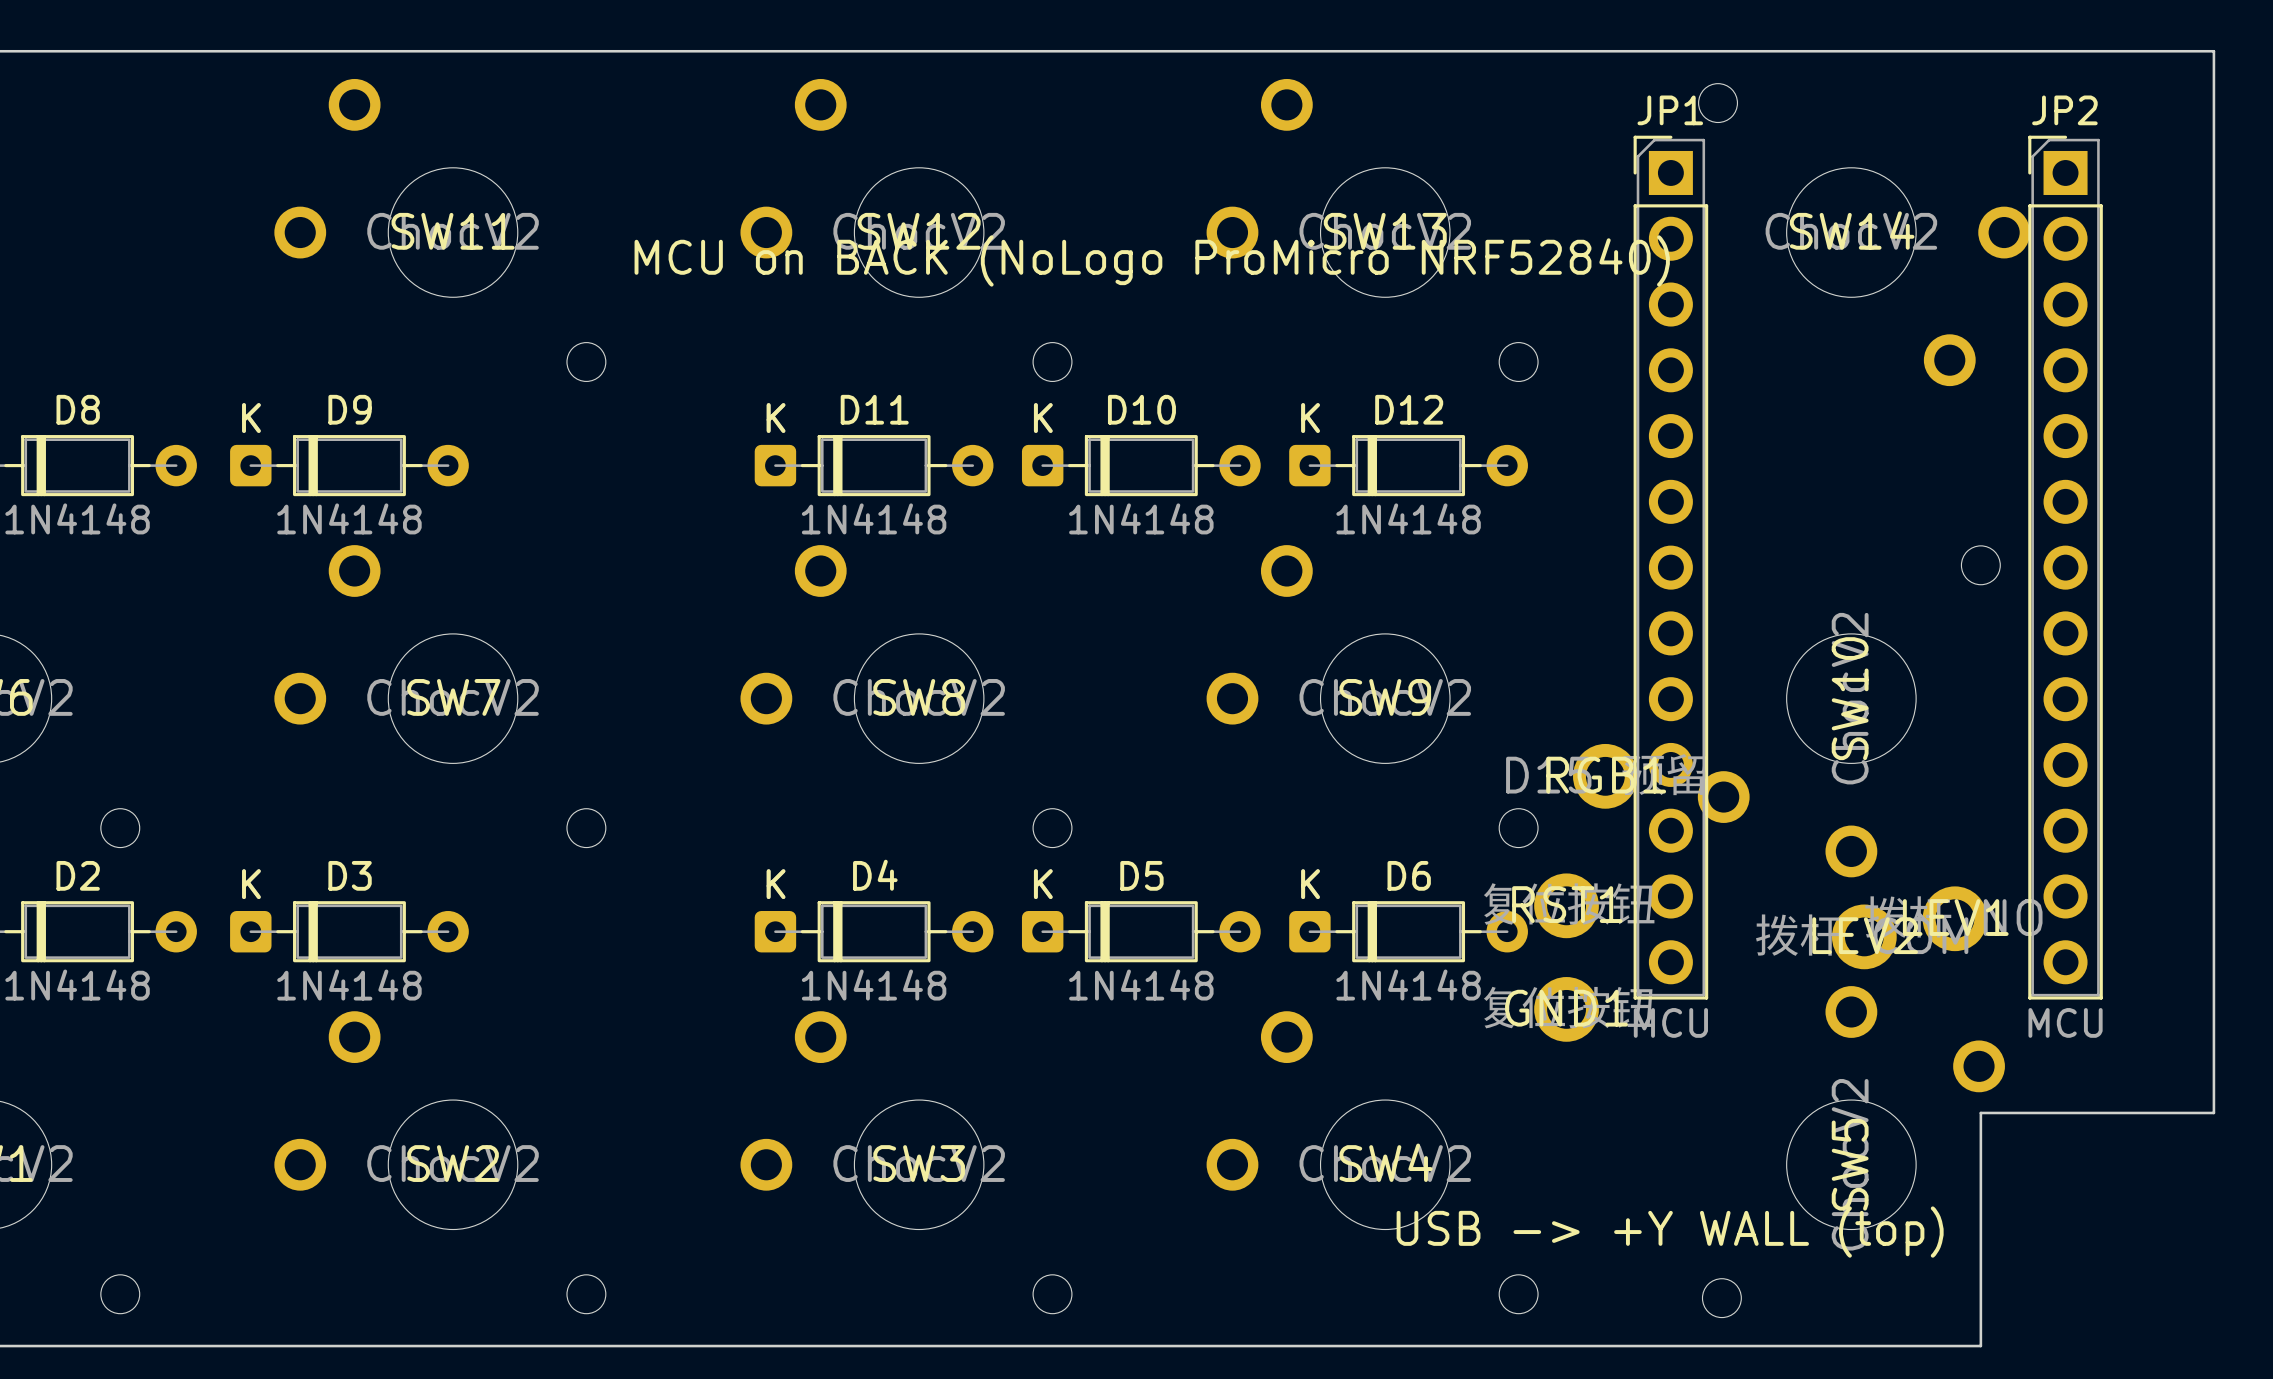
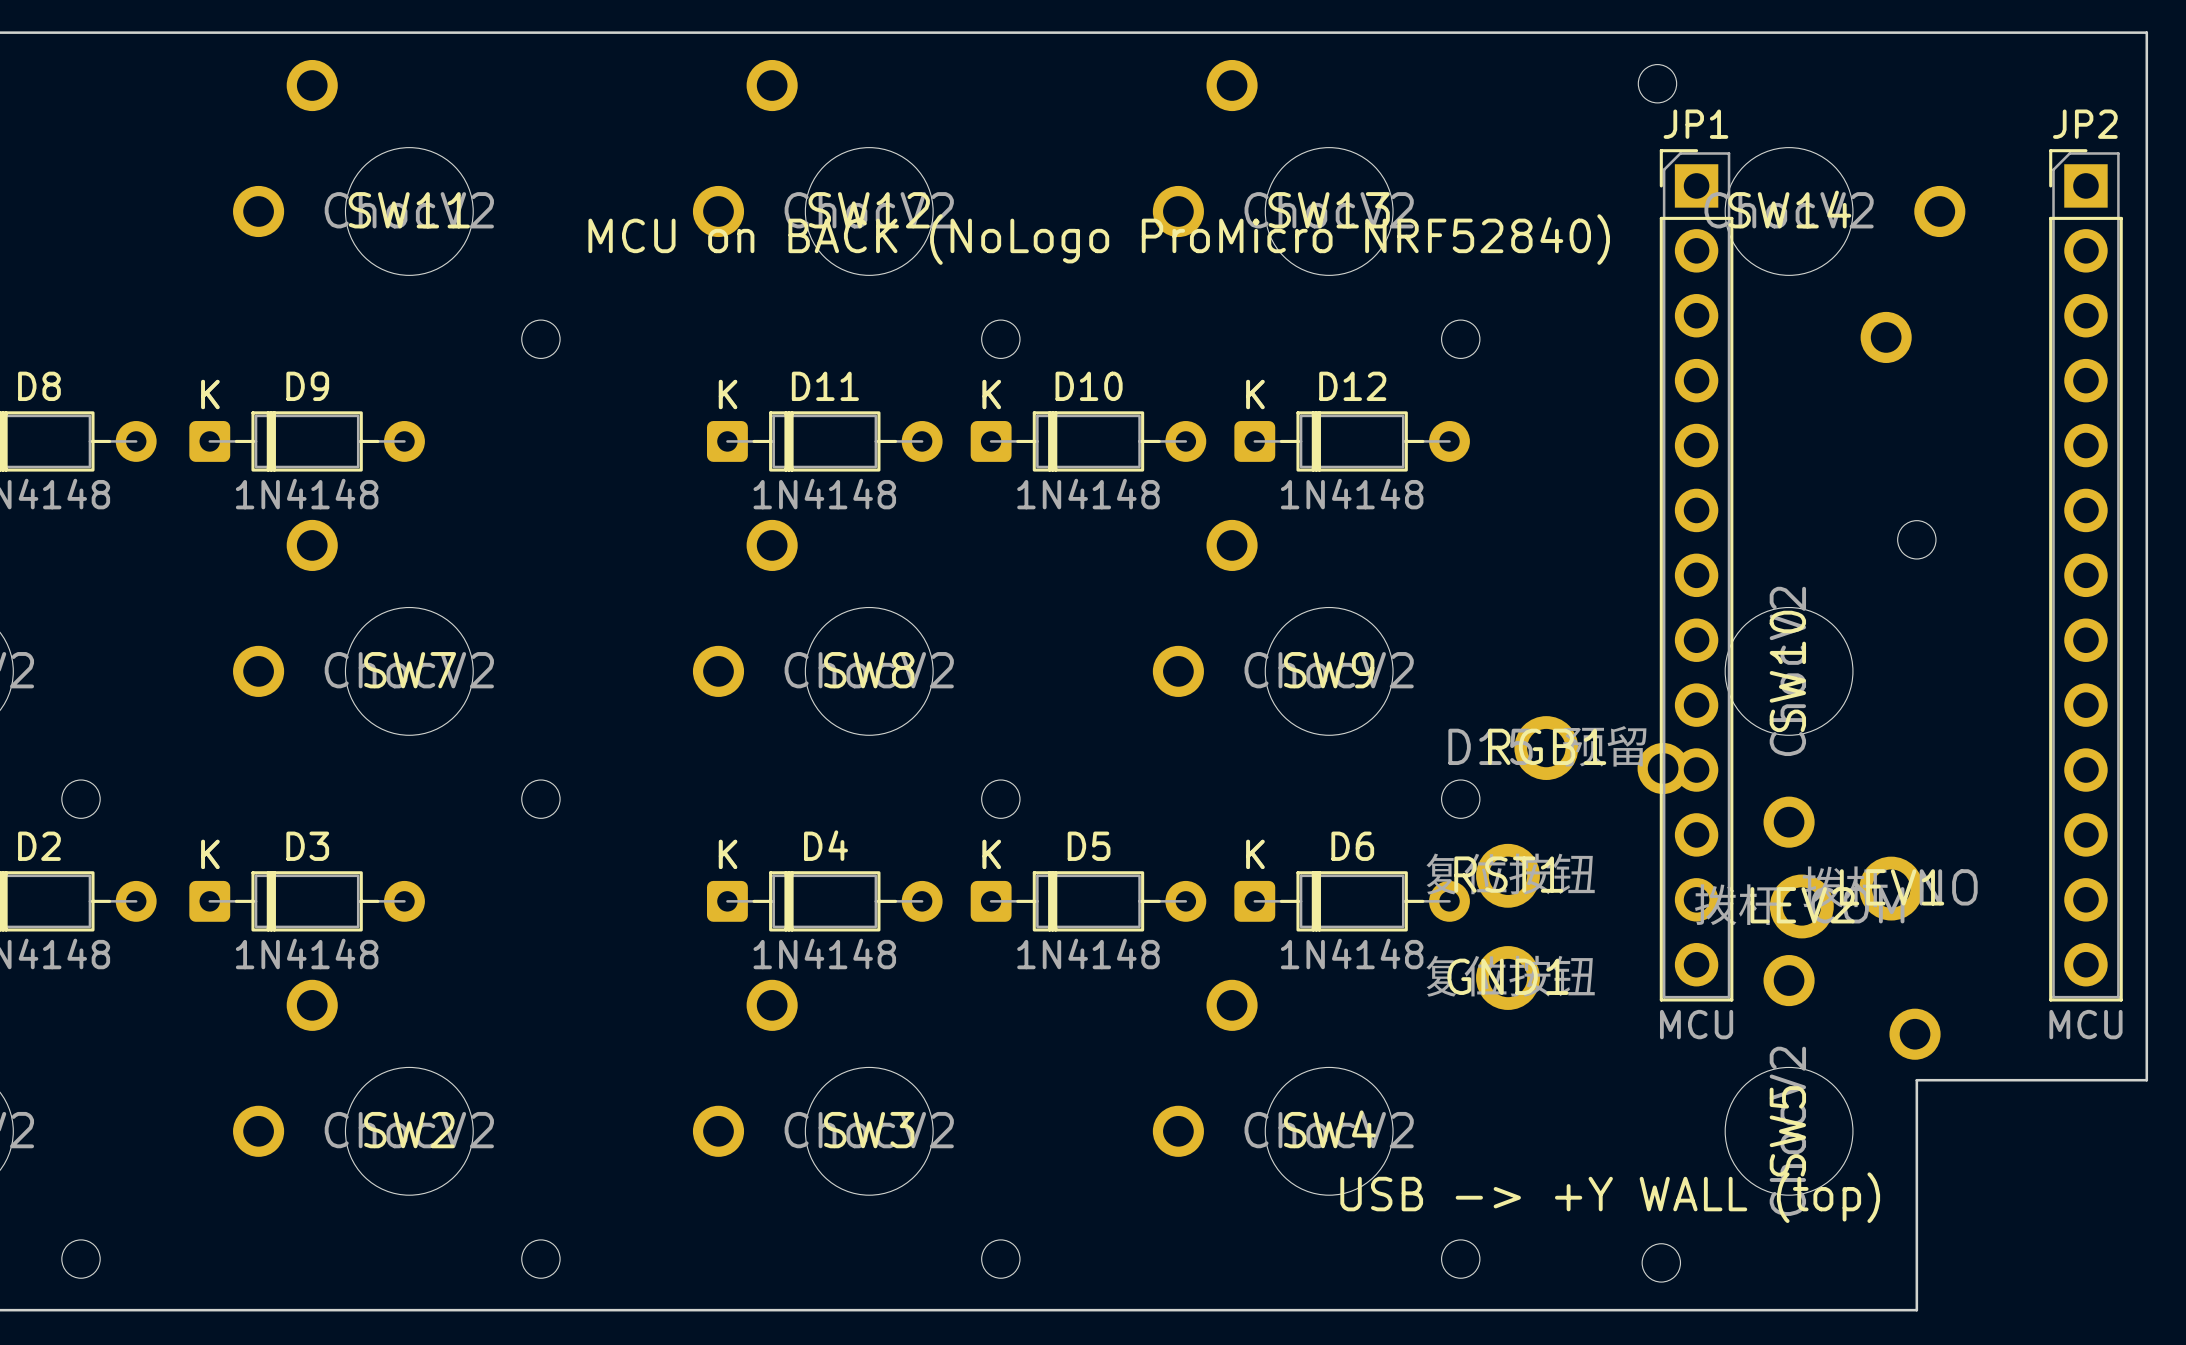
JP1 position: (1670, 567) -> (1696, 575)
JP2 position: (2065, 567) -> (2085, 575)

